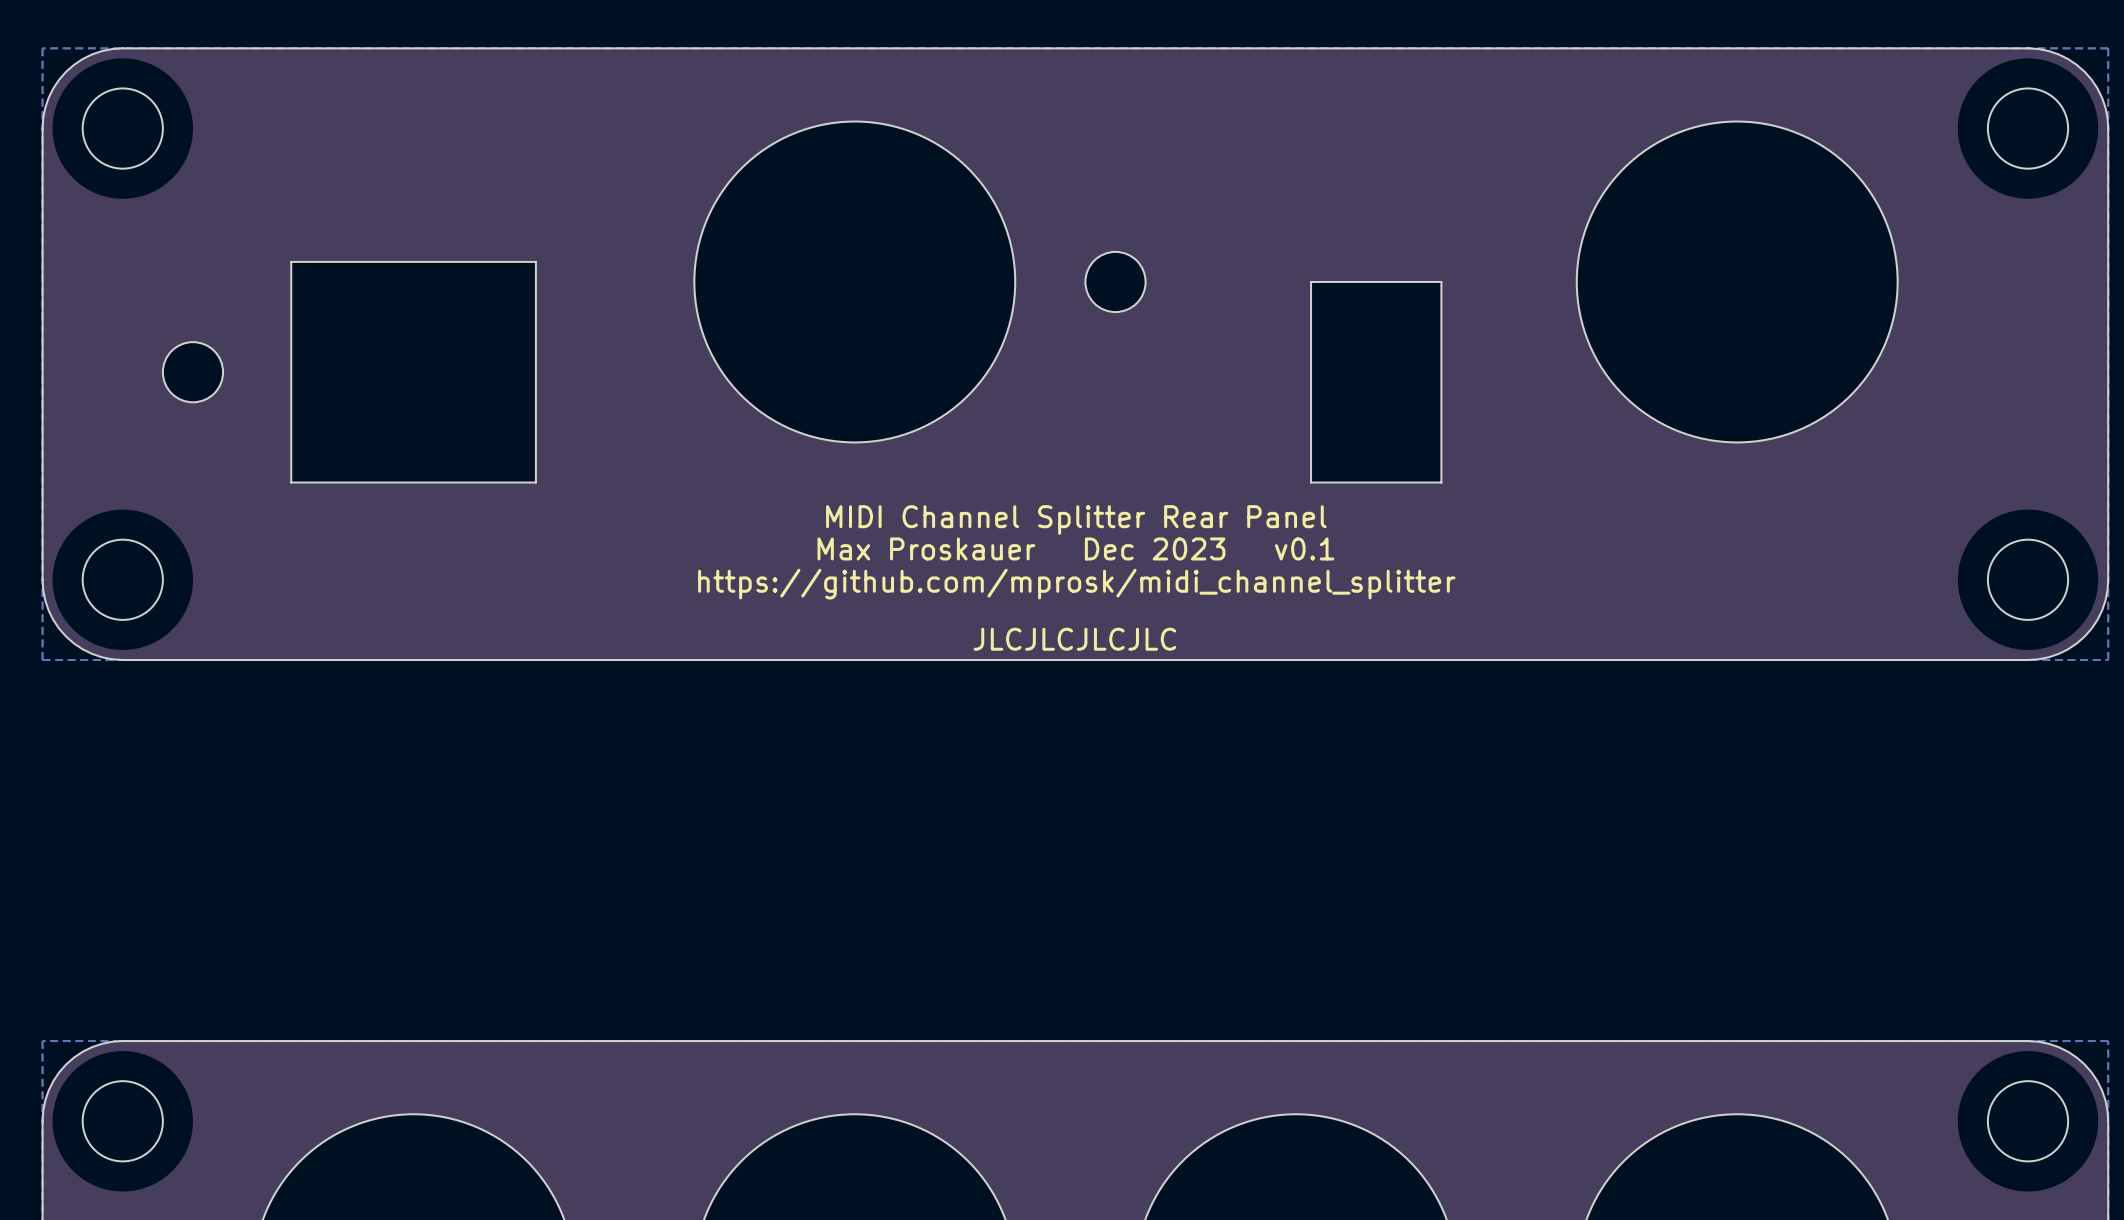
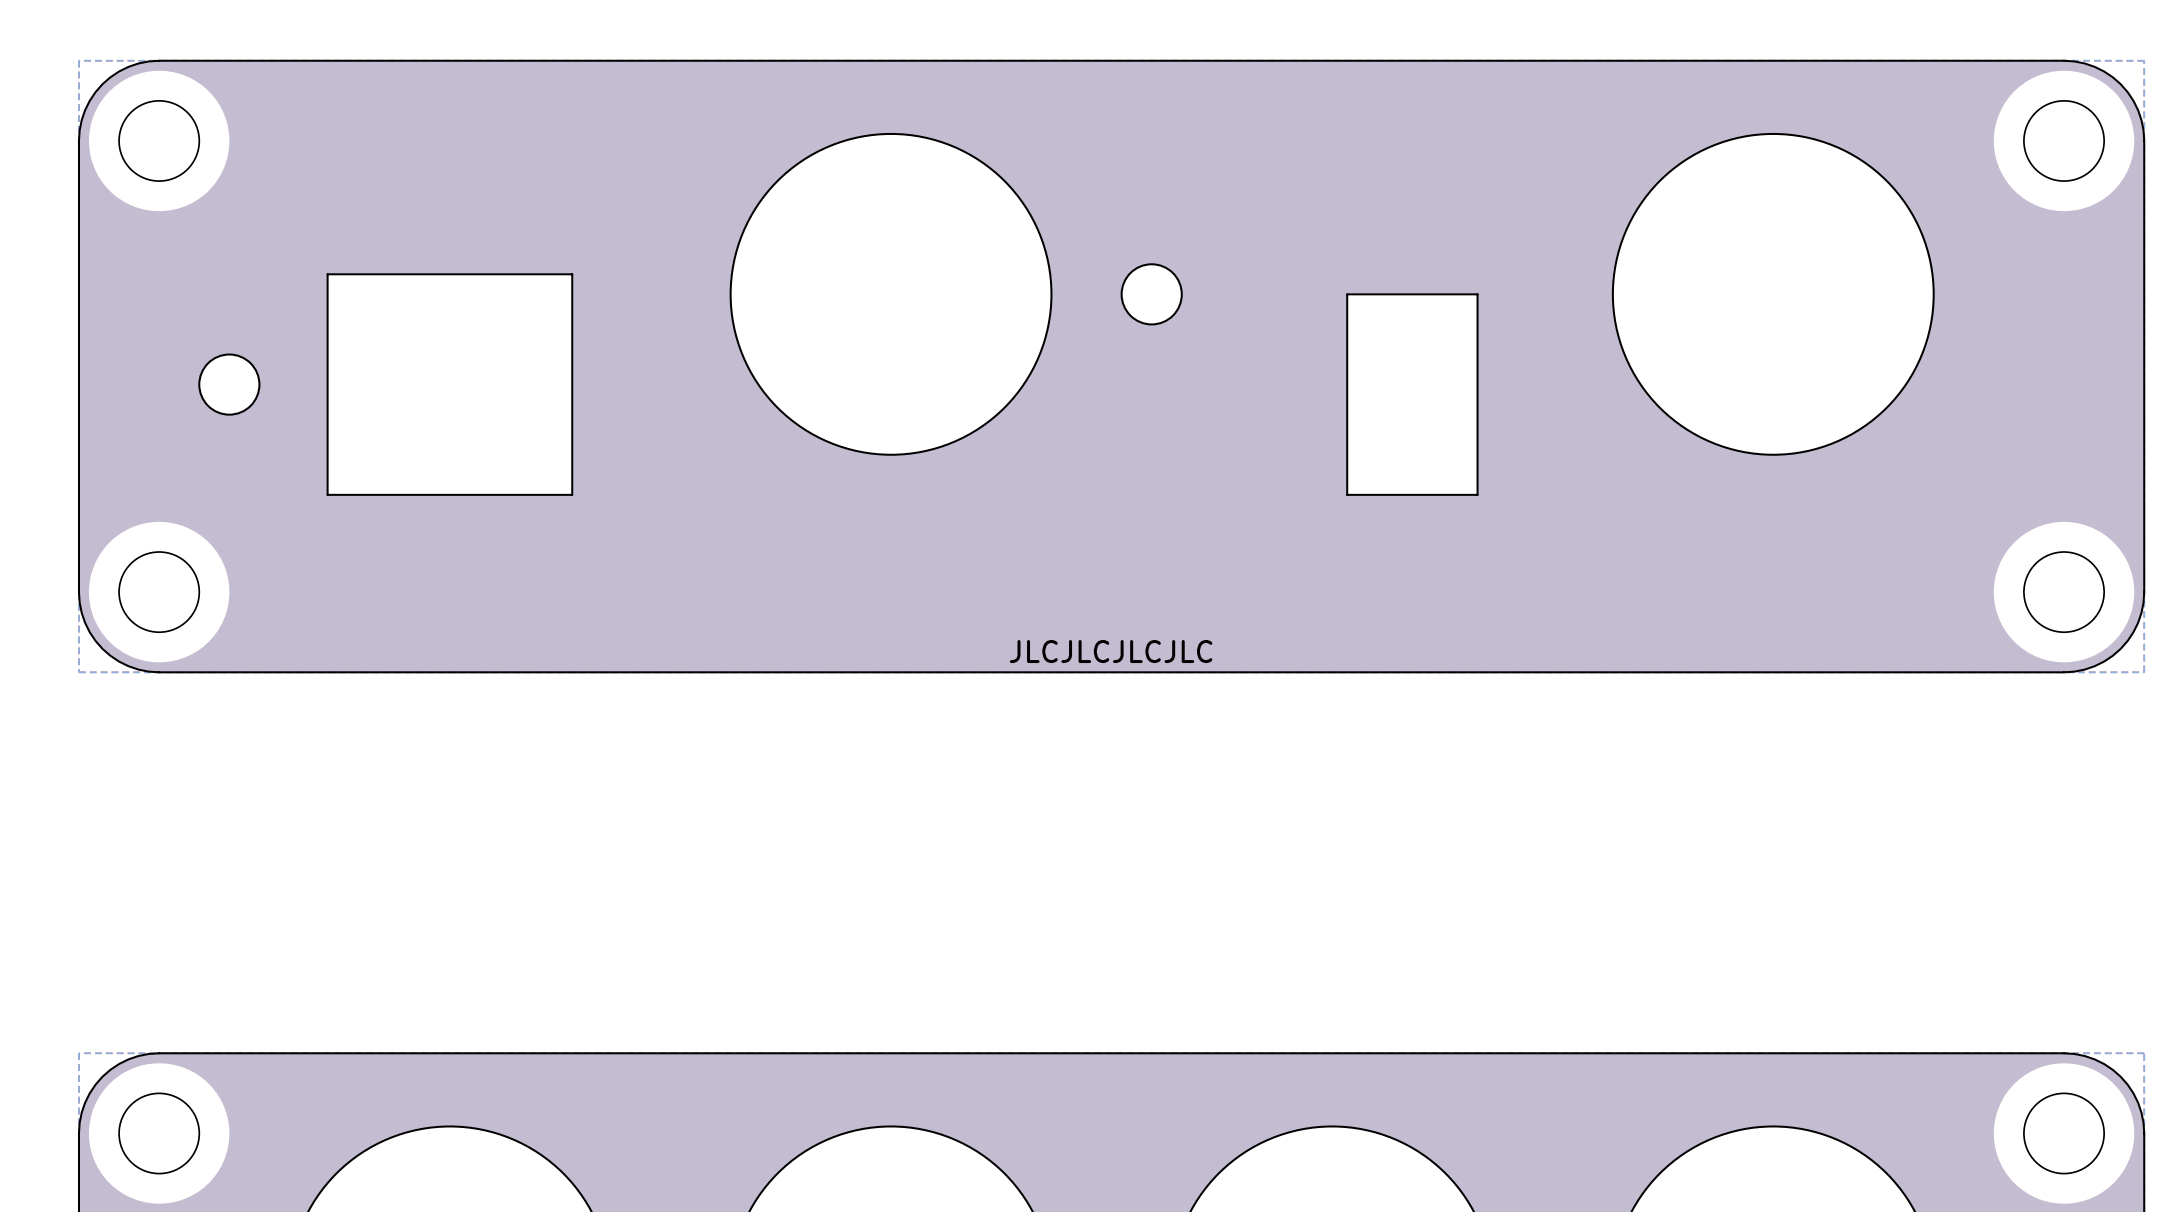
text: MIDI Channel Splitter Rear Panel (1076, 520) -> none
text: Max Proskauer Dec 2023 v0.1 (1075, 548) -> none
text: https://github.com/mprosk/midi_channel_splitter (1076, 584) -> none

